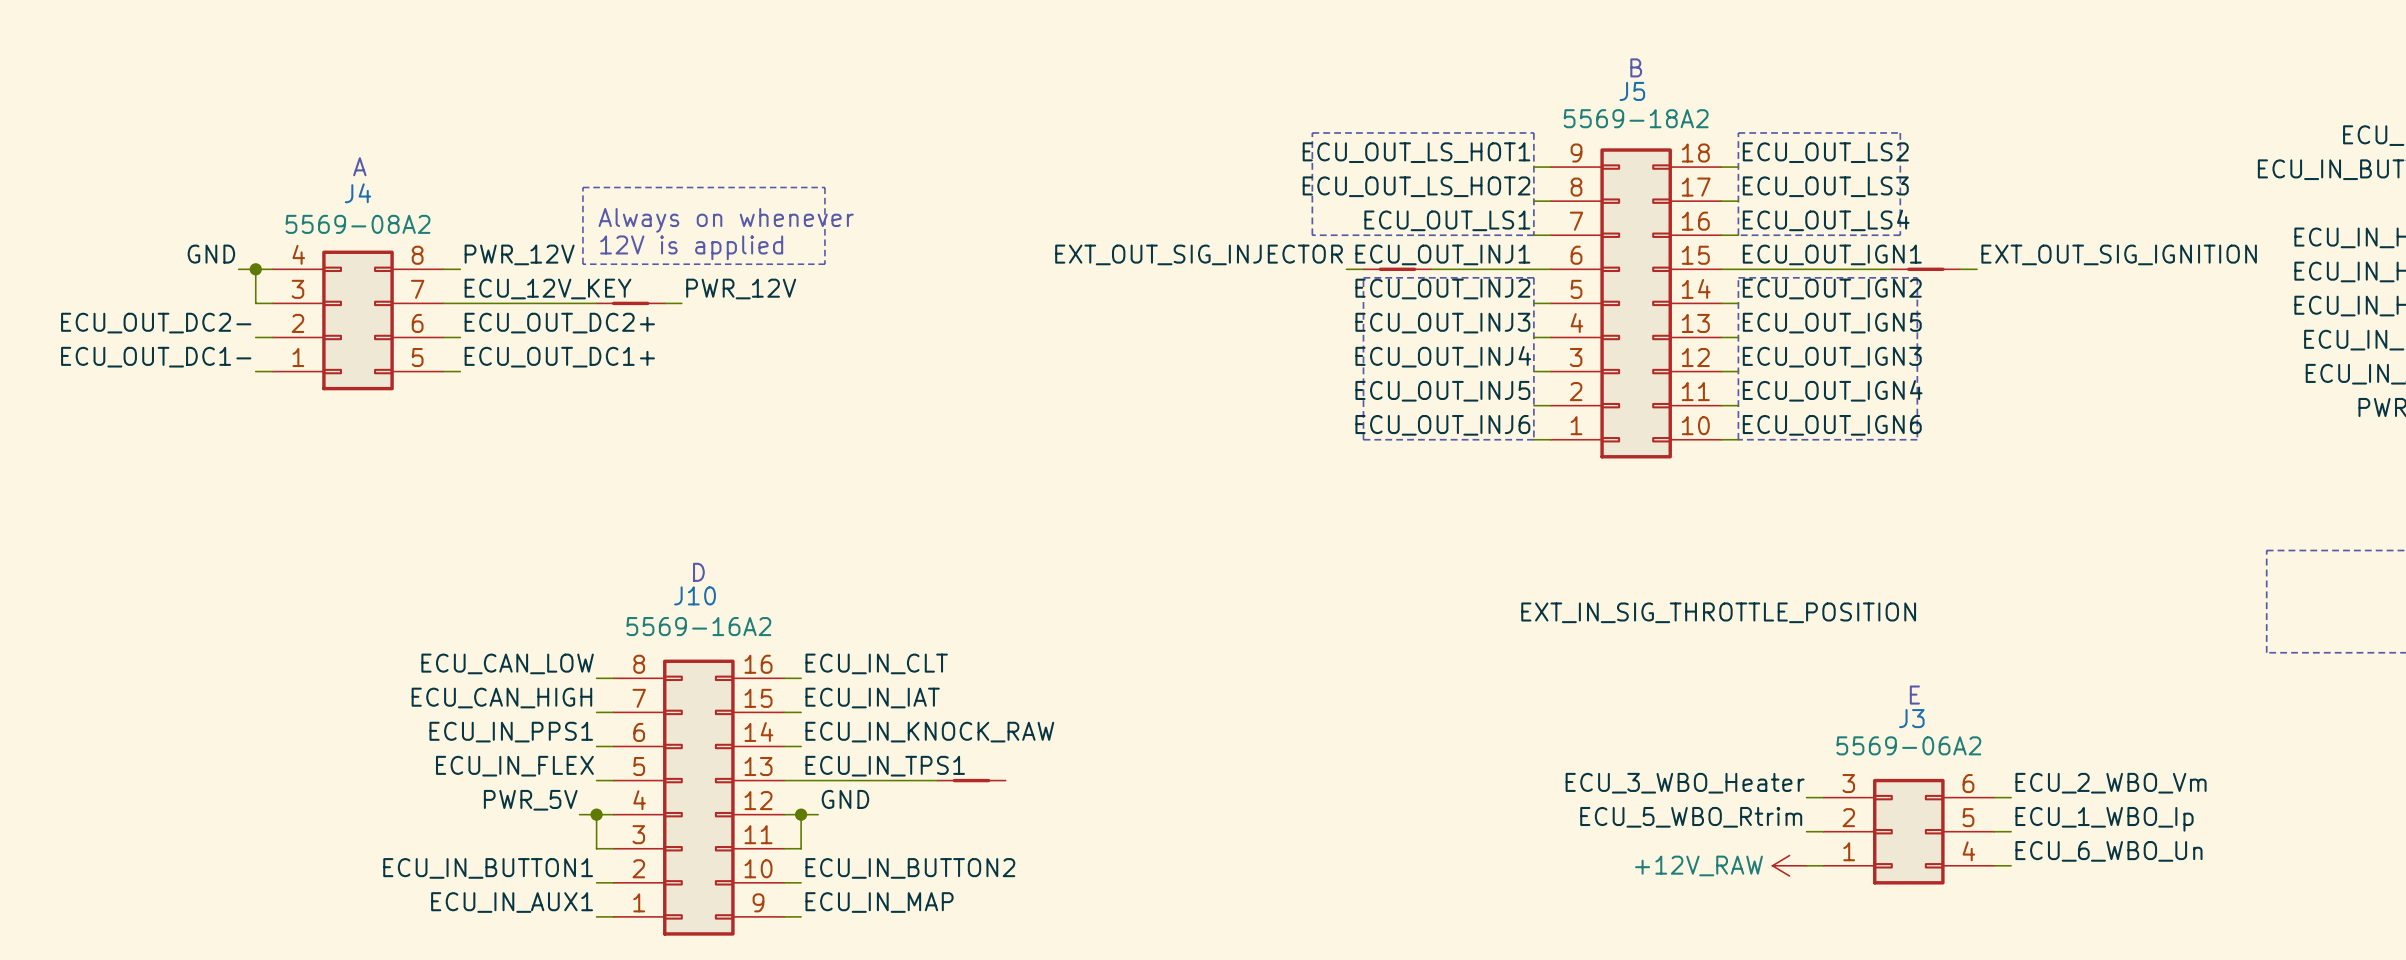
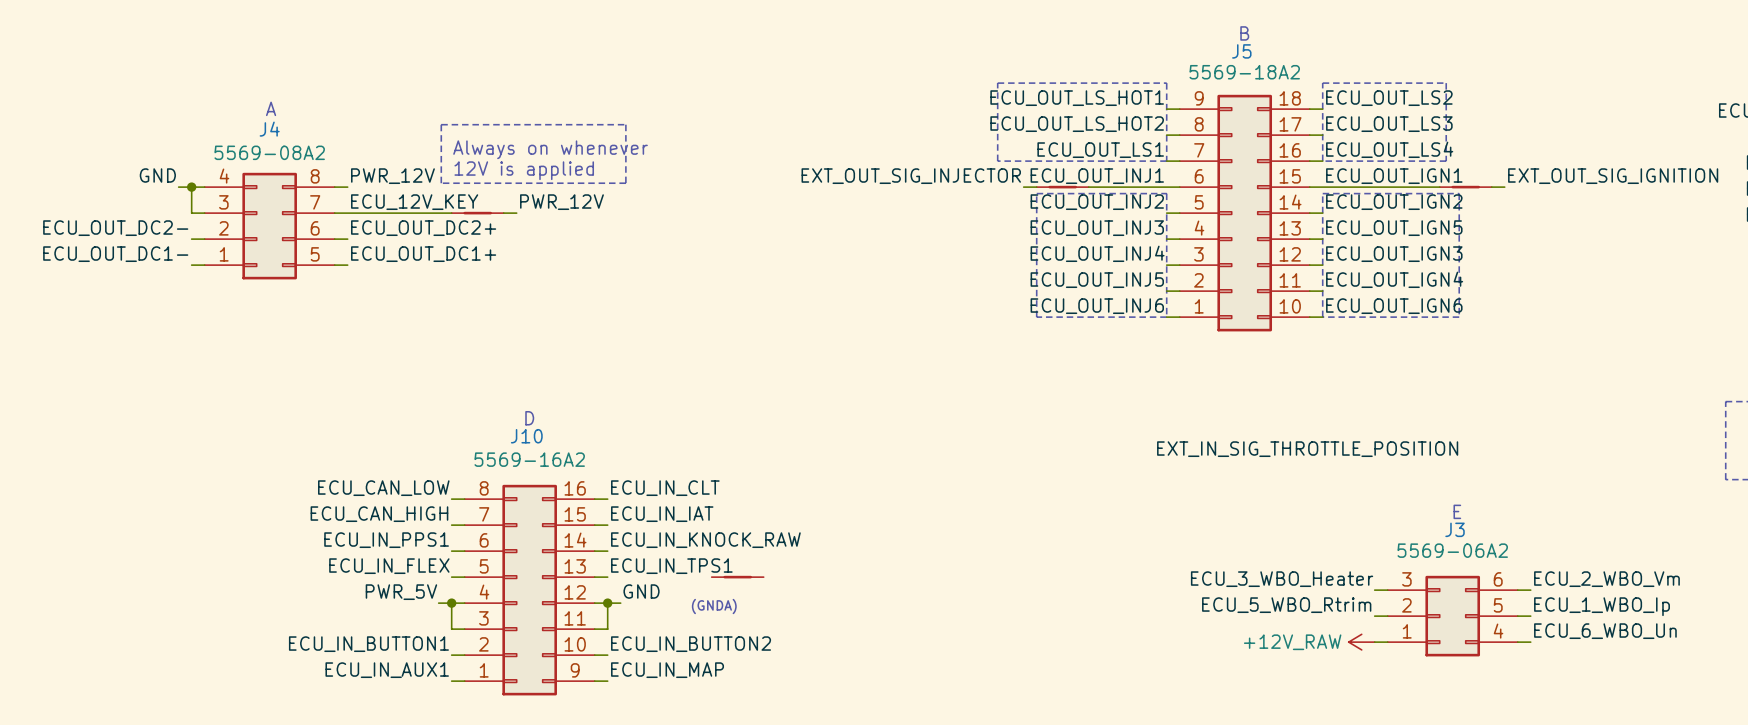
wire: (801, 780) (937, 780) -> none
text: none -> (GNDA) (714, 606)

